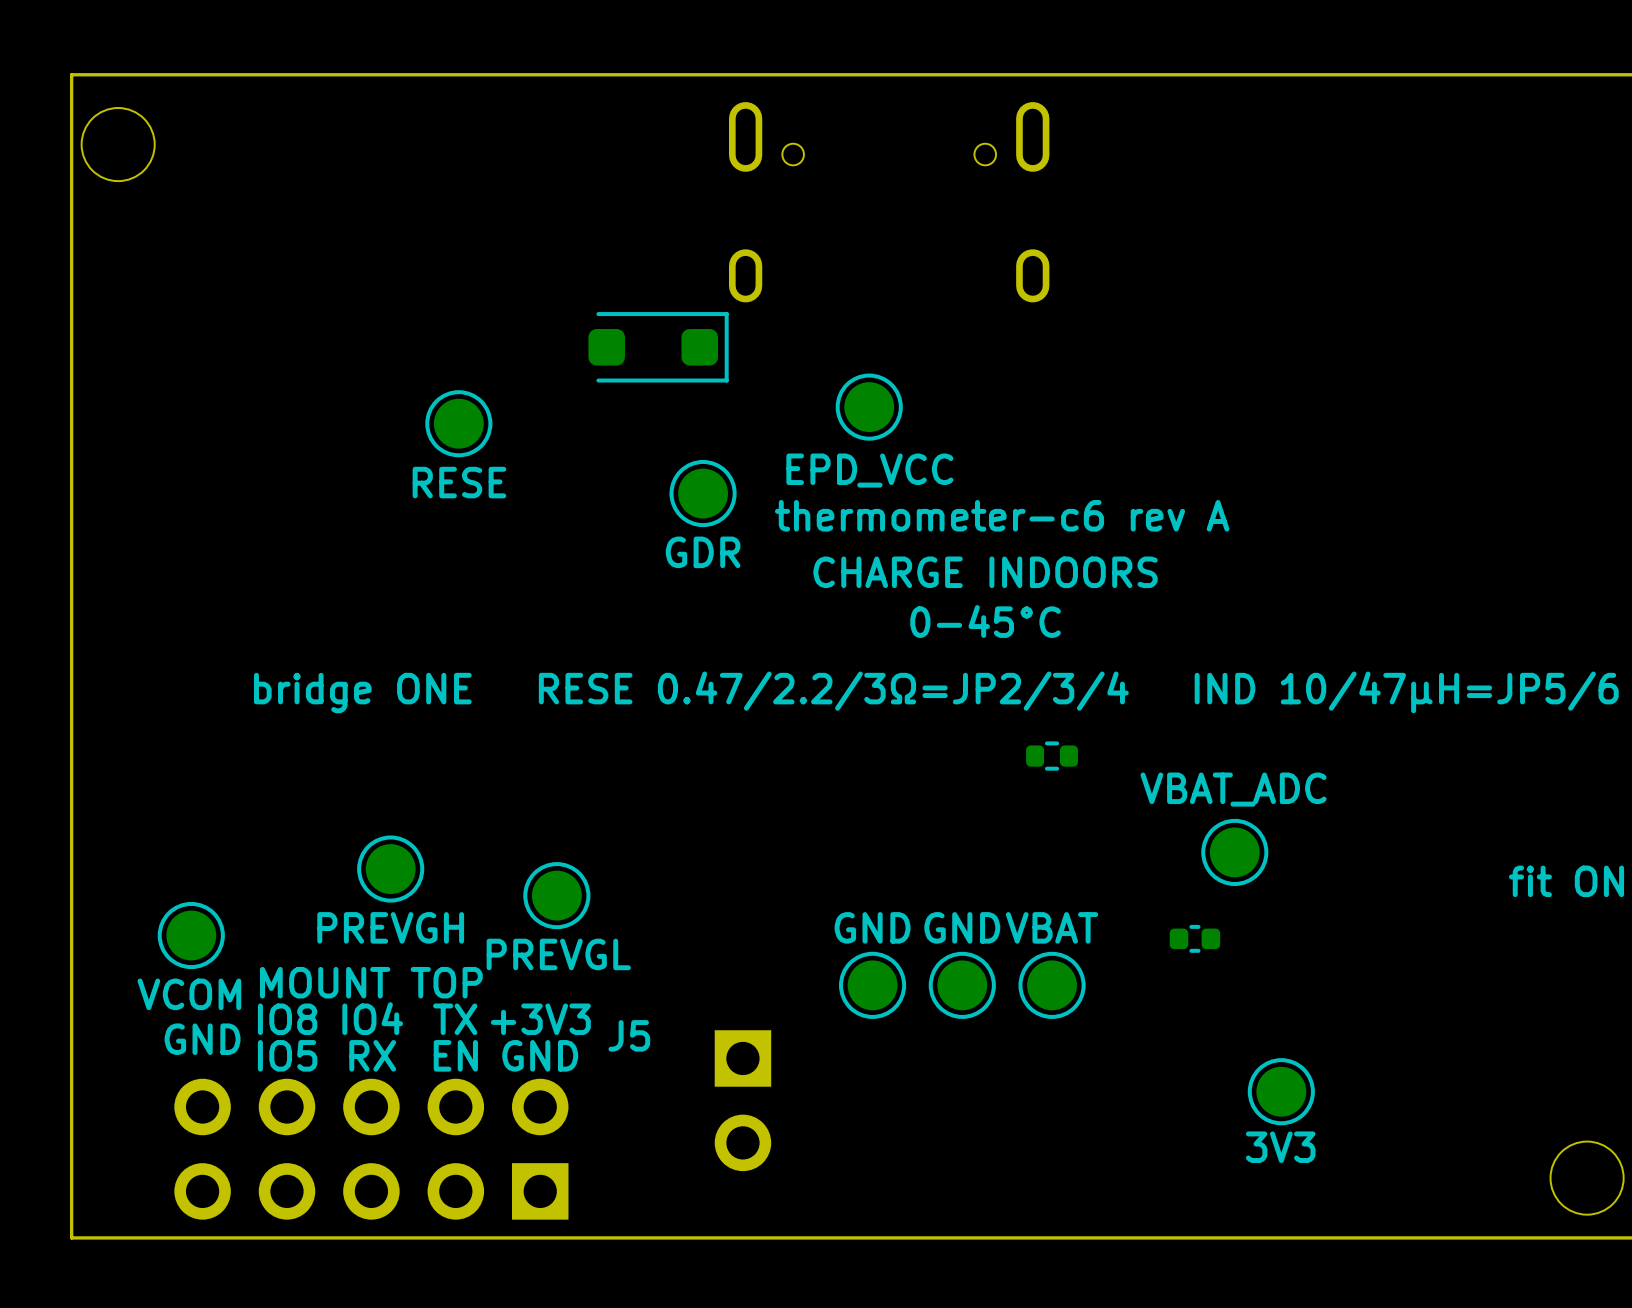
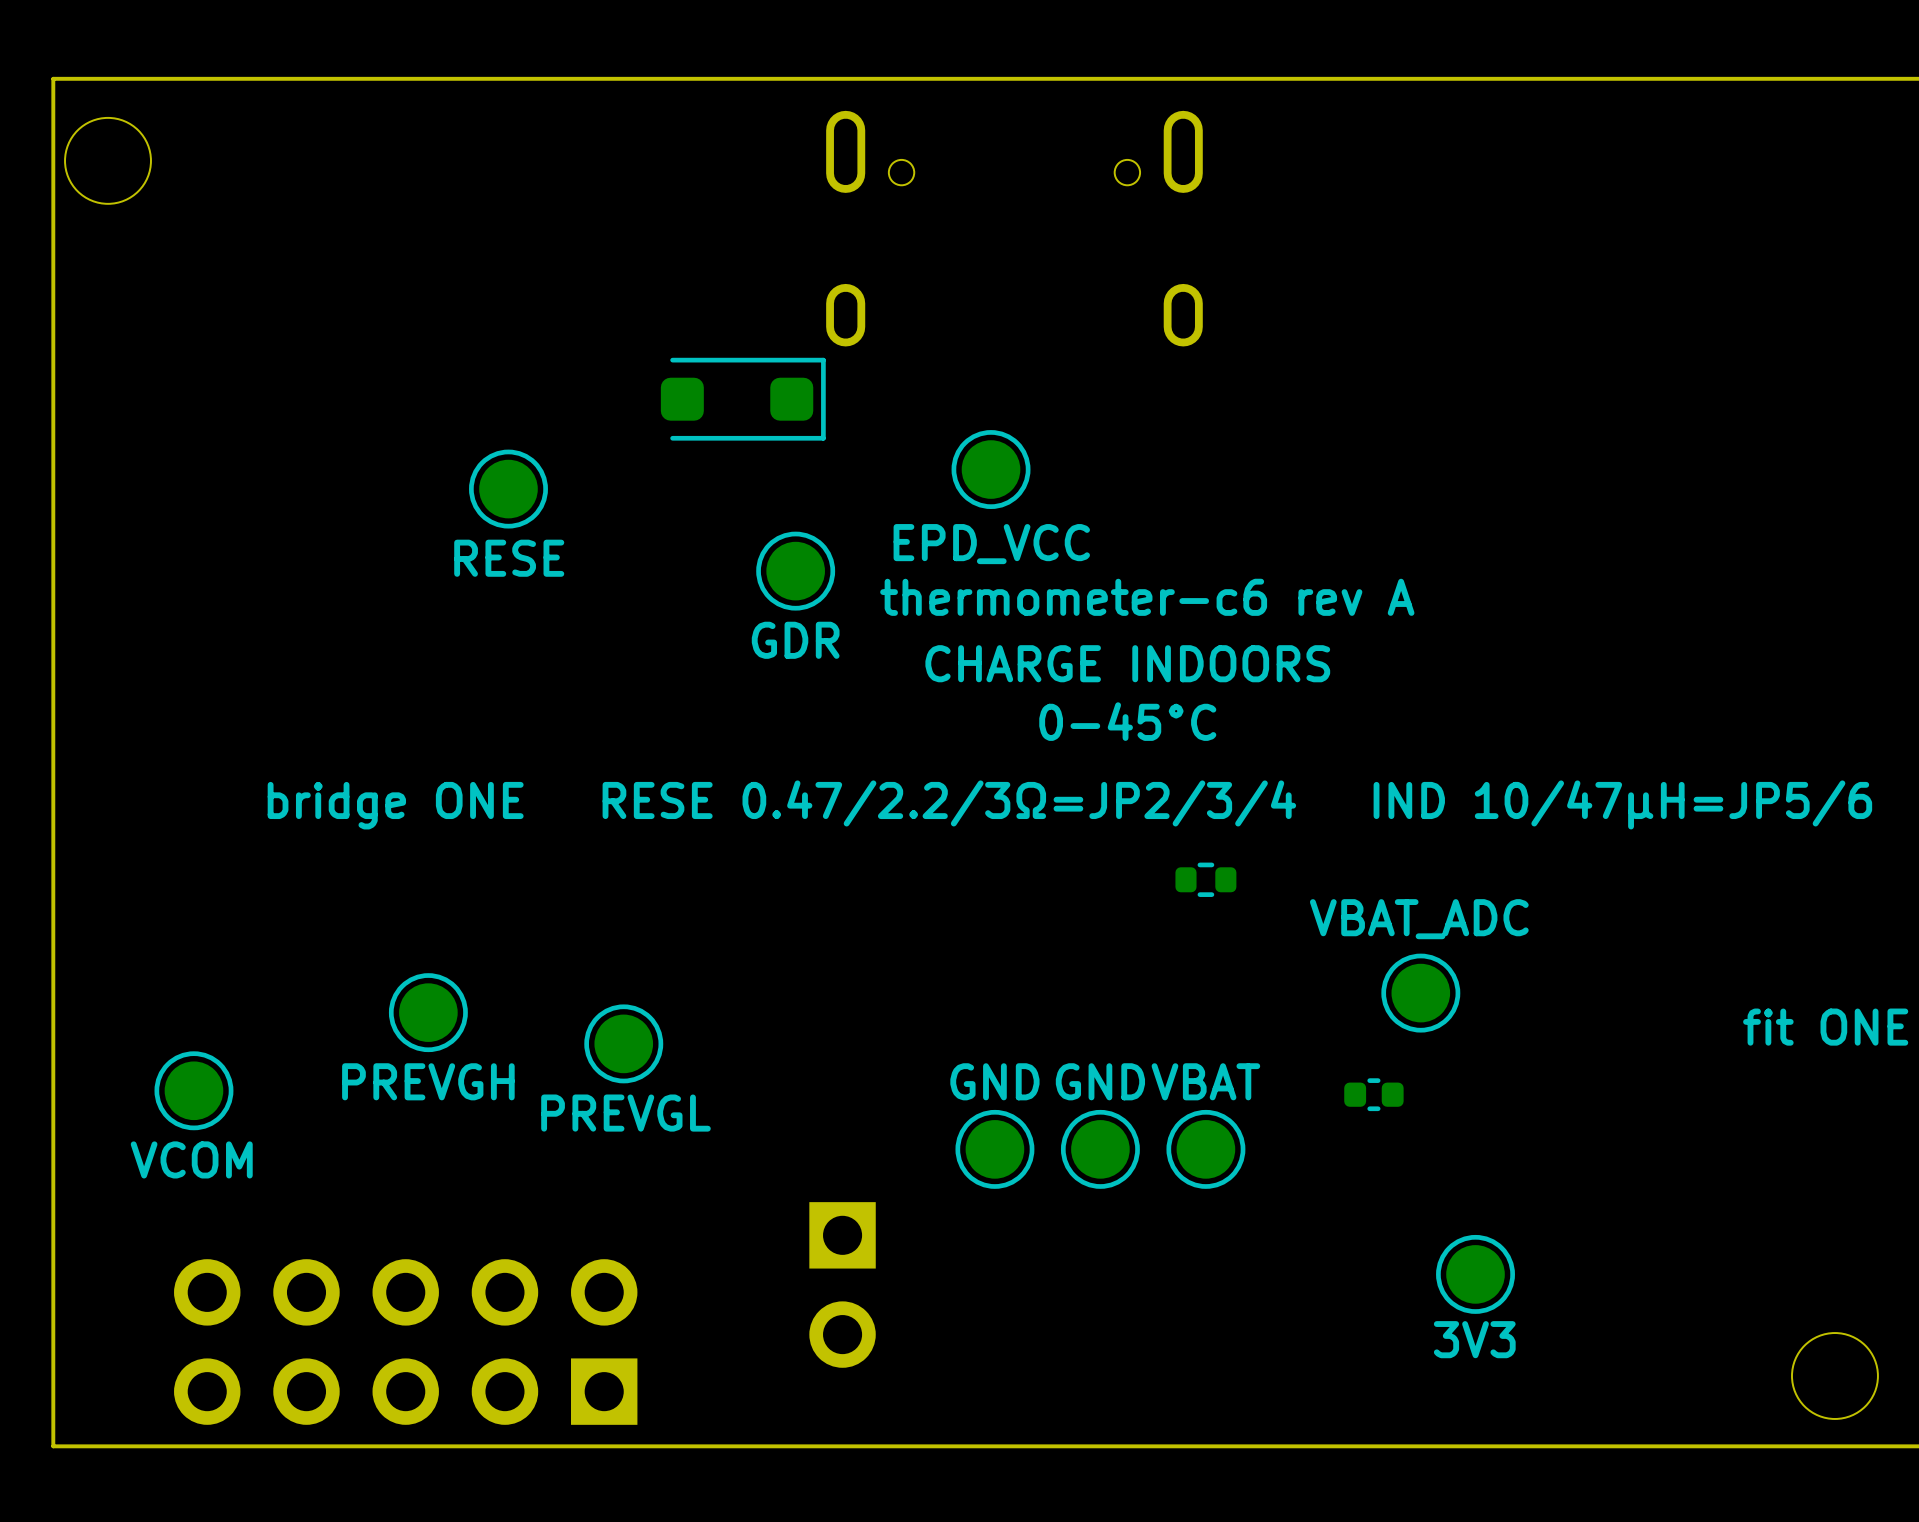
text: MOUNT TOP (371, 982) -> none
text: IO4 (372, 1018) -> none
text: IO8 (287, 1019) -> none
text: TX (455, 1019) -> none
text: +3V3 (540, 1019) -> none
text: J5 (629, 1035) -> none
text: GND (202, 1039) -> none
text: IO5 (287, 1055) -> none
text: RX (372, 1055) -> none
text: EN (455, 1055) -> none
text: GND (540, 1055) -> none

